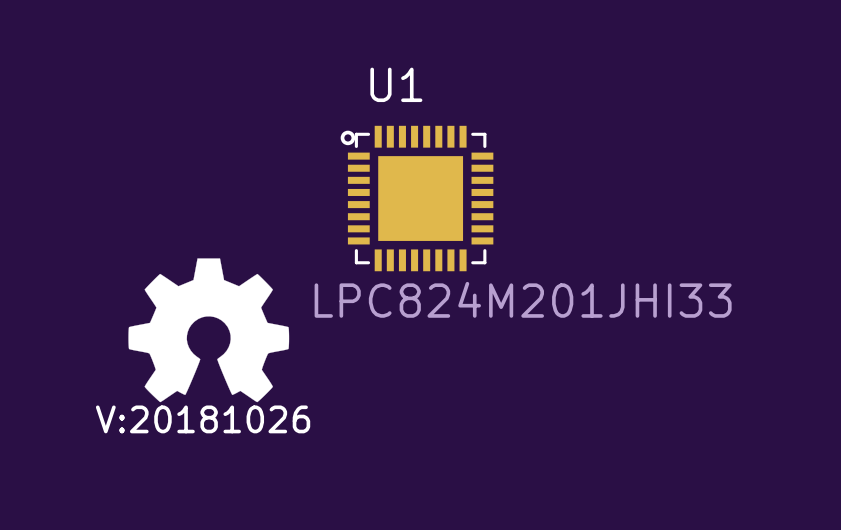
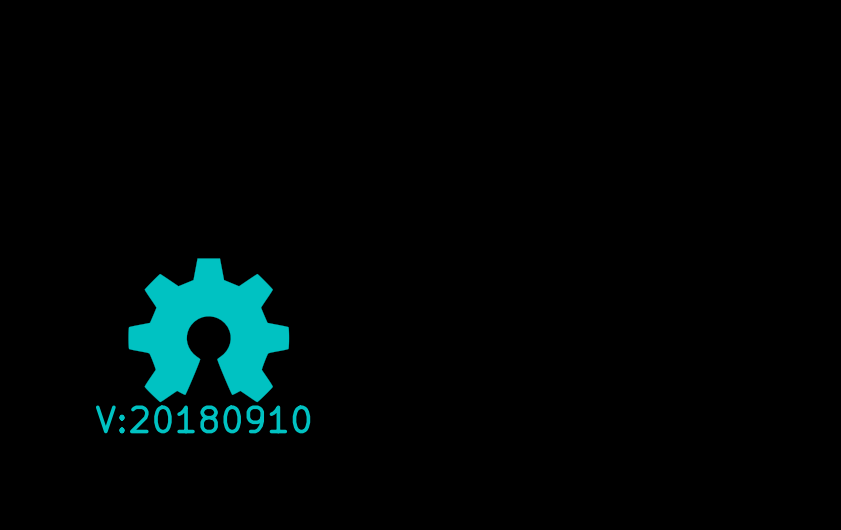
U1: LPC824M201JHI33 (417, 198) -> none
drawing shape: [95, 405, 311, 434] -> [95, 405, 311, 434]

